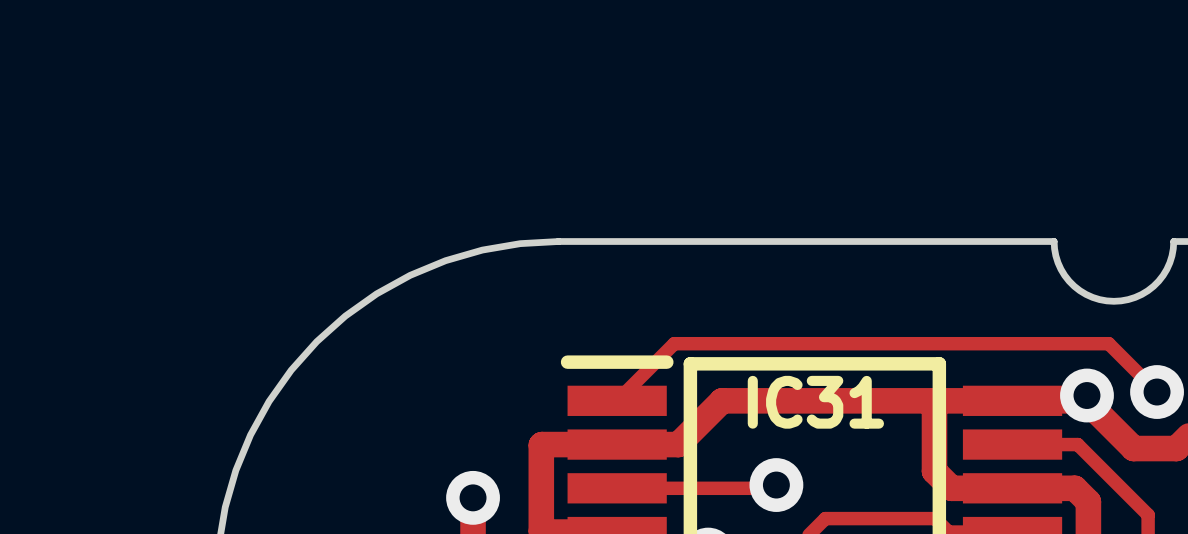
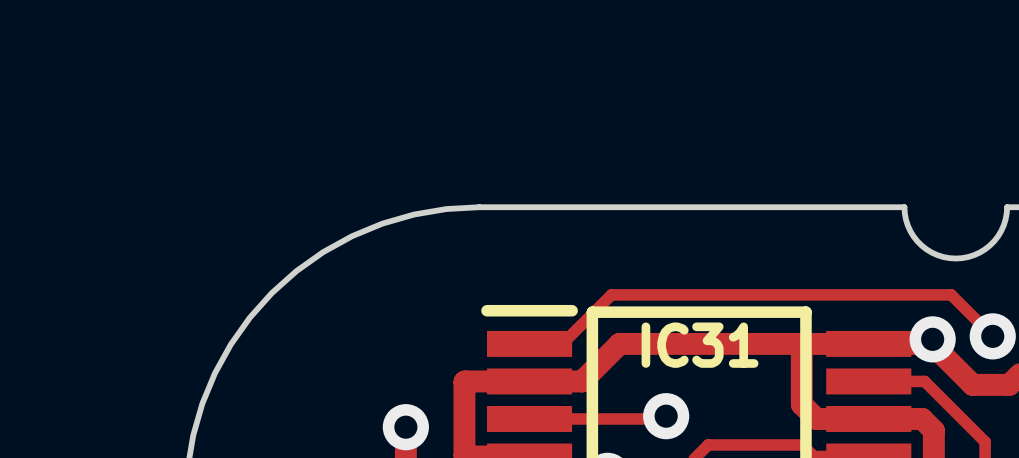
track: (712, 343) (674, 343) (617, 400) -> (611, 294) (562, 343)

